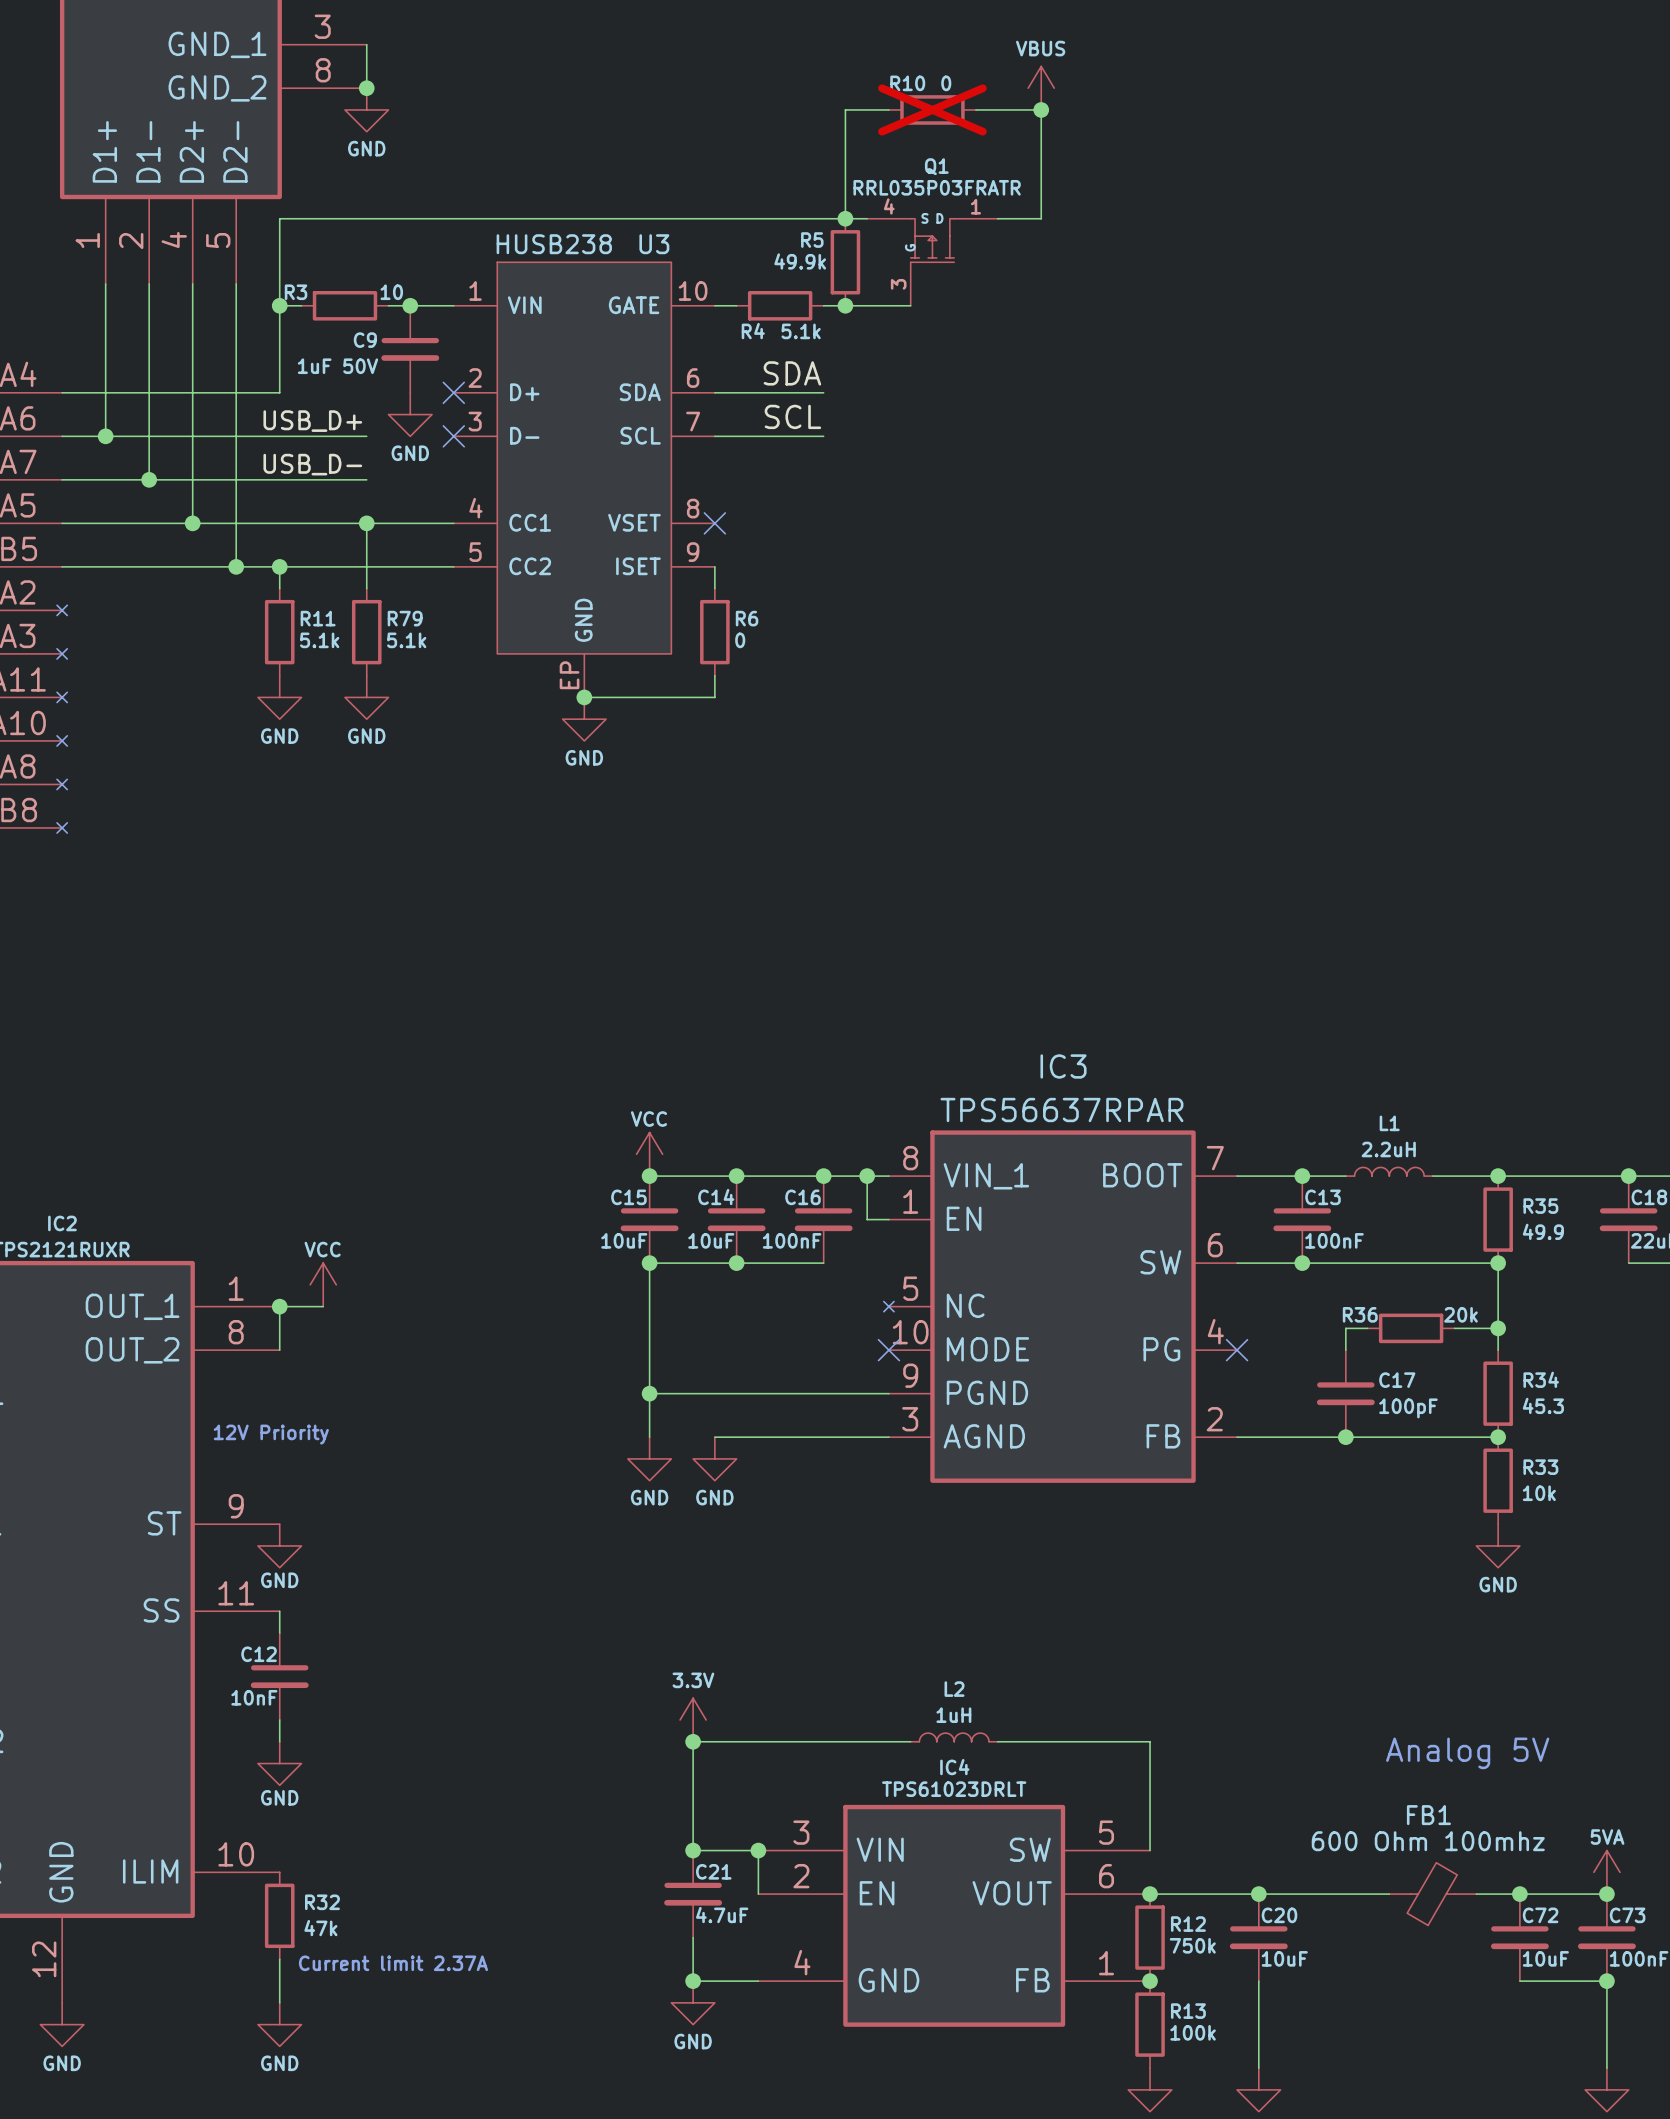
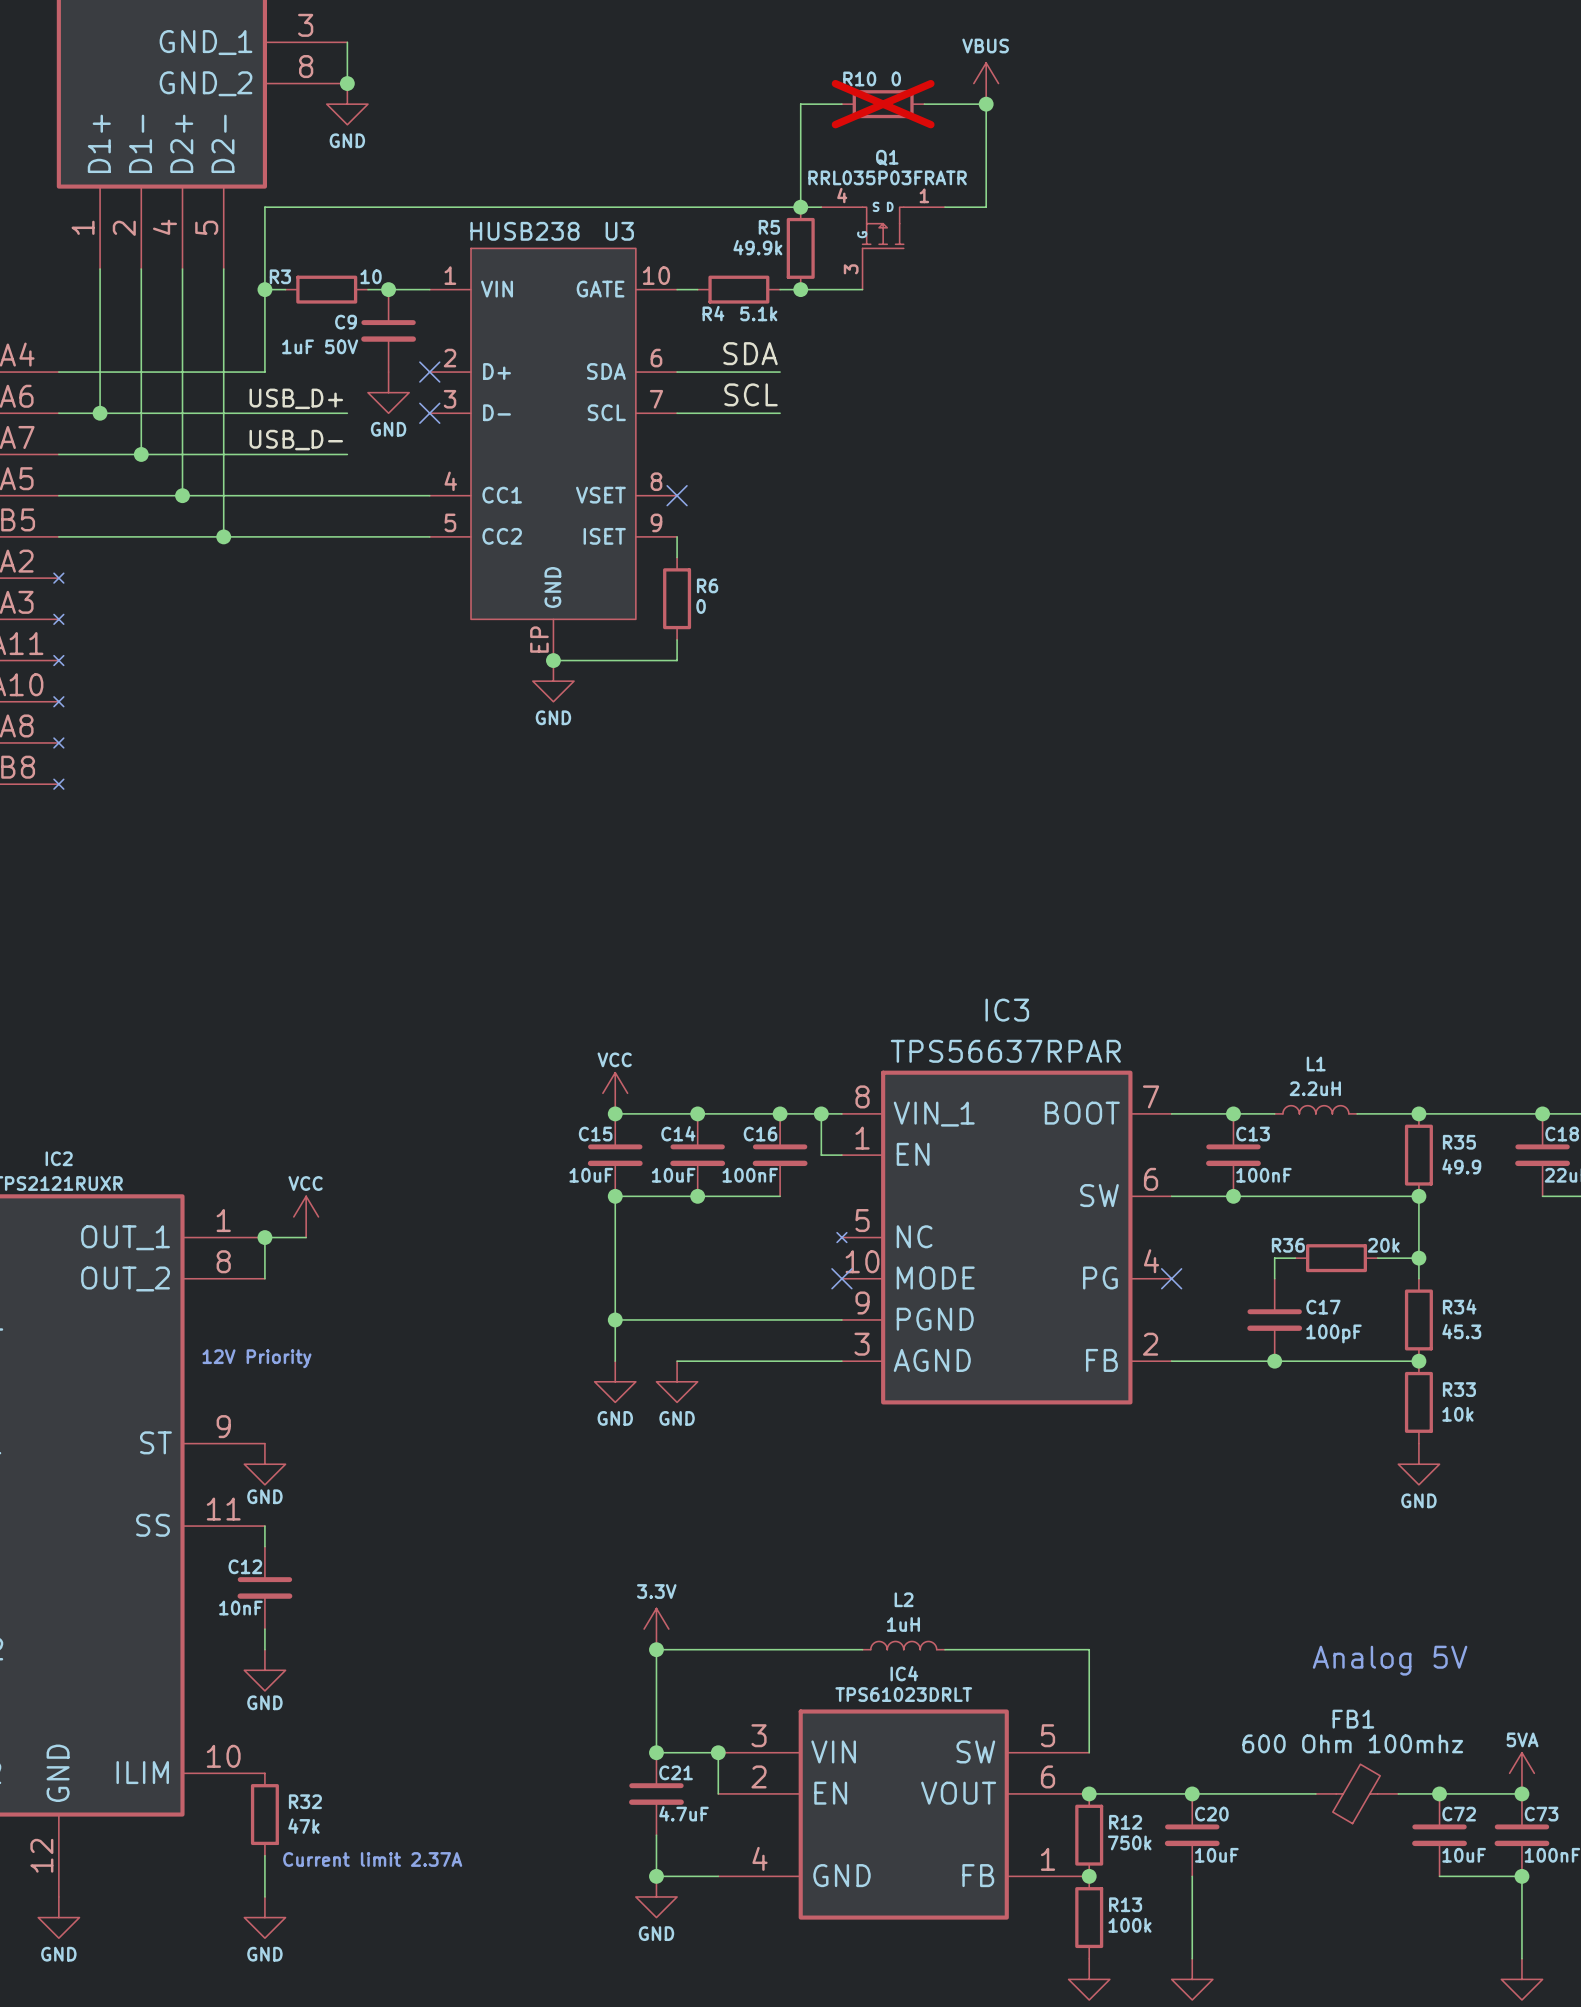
wire: (366, 523) (366, 588) -> none
junction: (366, 523) -> none
wire: (279, 566) (279, 588) -> none
junction: (279, 566) -> none
R11: 5.1k (279, 632) -> none
R79: 5.1k (366, 632) -> none
power symbol: GND (279, 697) -> none
power symbol: GND (366, 697) -> none

